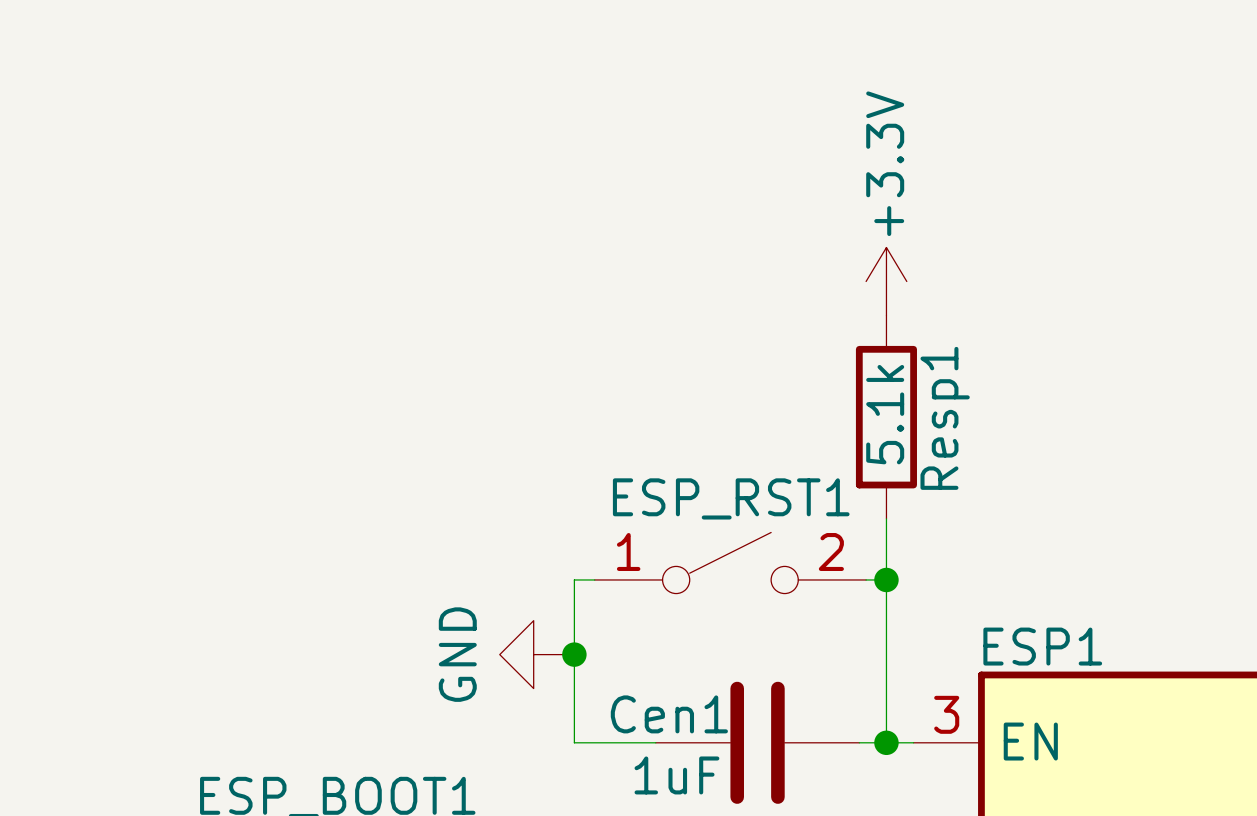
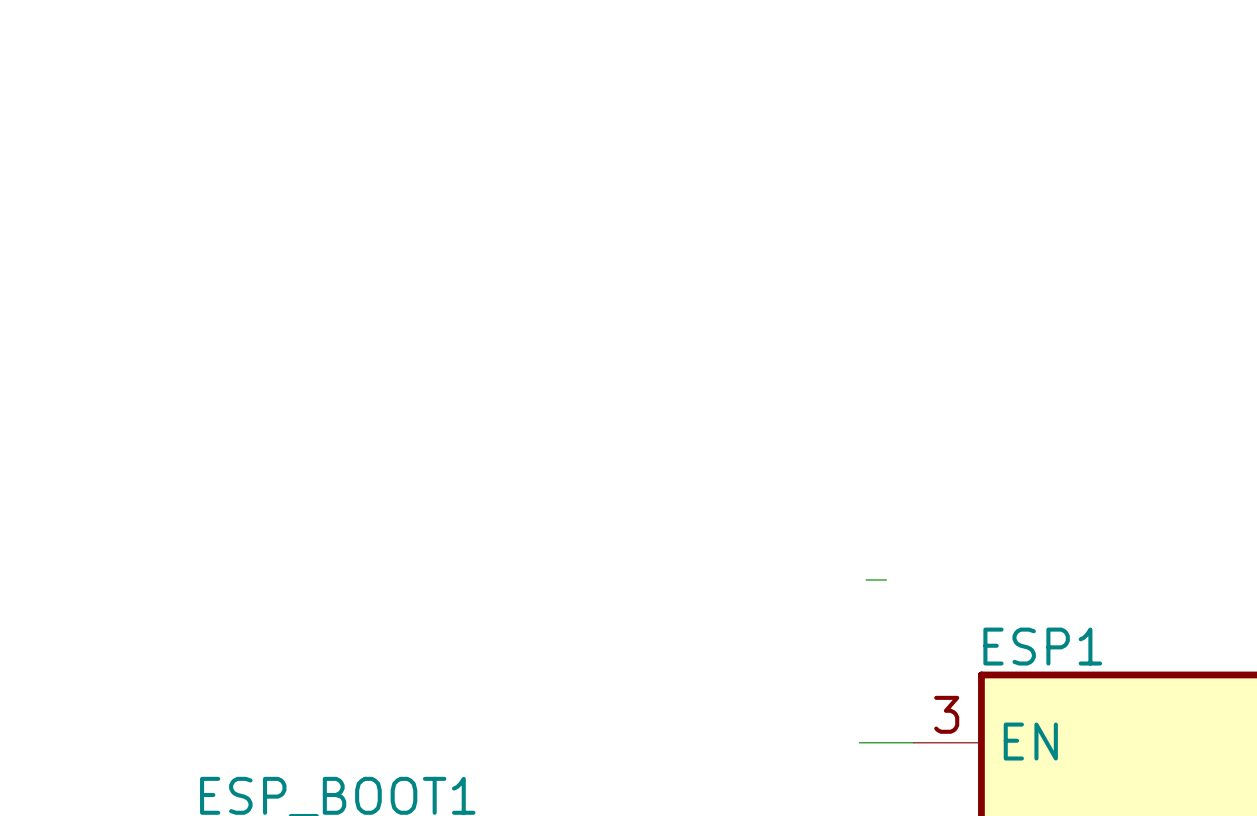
power symbol: +3.3V (886, 281) -> none
Resp1: 5.1k (886, 417) -> none
wire: (886, 518) (886, 742) -> none
ESP_RST1: (730, 563) -> none
wire: (594, 579) (574, 579) (574, 742) (655, 742) -> none
junction: (886, 579) -> none
power symbol: GND (533, 654) -> none
junction: (574, 654) -> none
Cen1: 1uF (757, 742) -> none
junction: (886, 742) -> none

